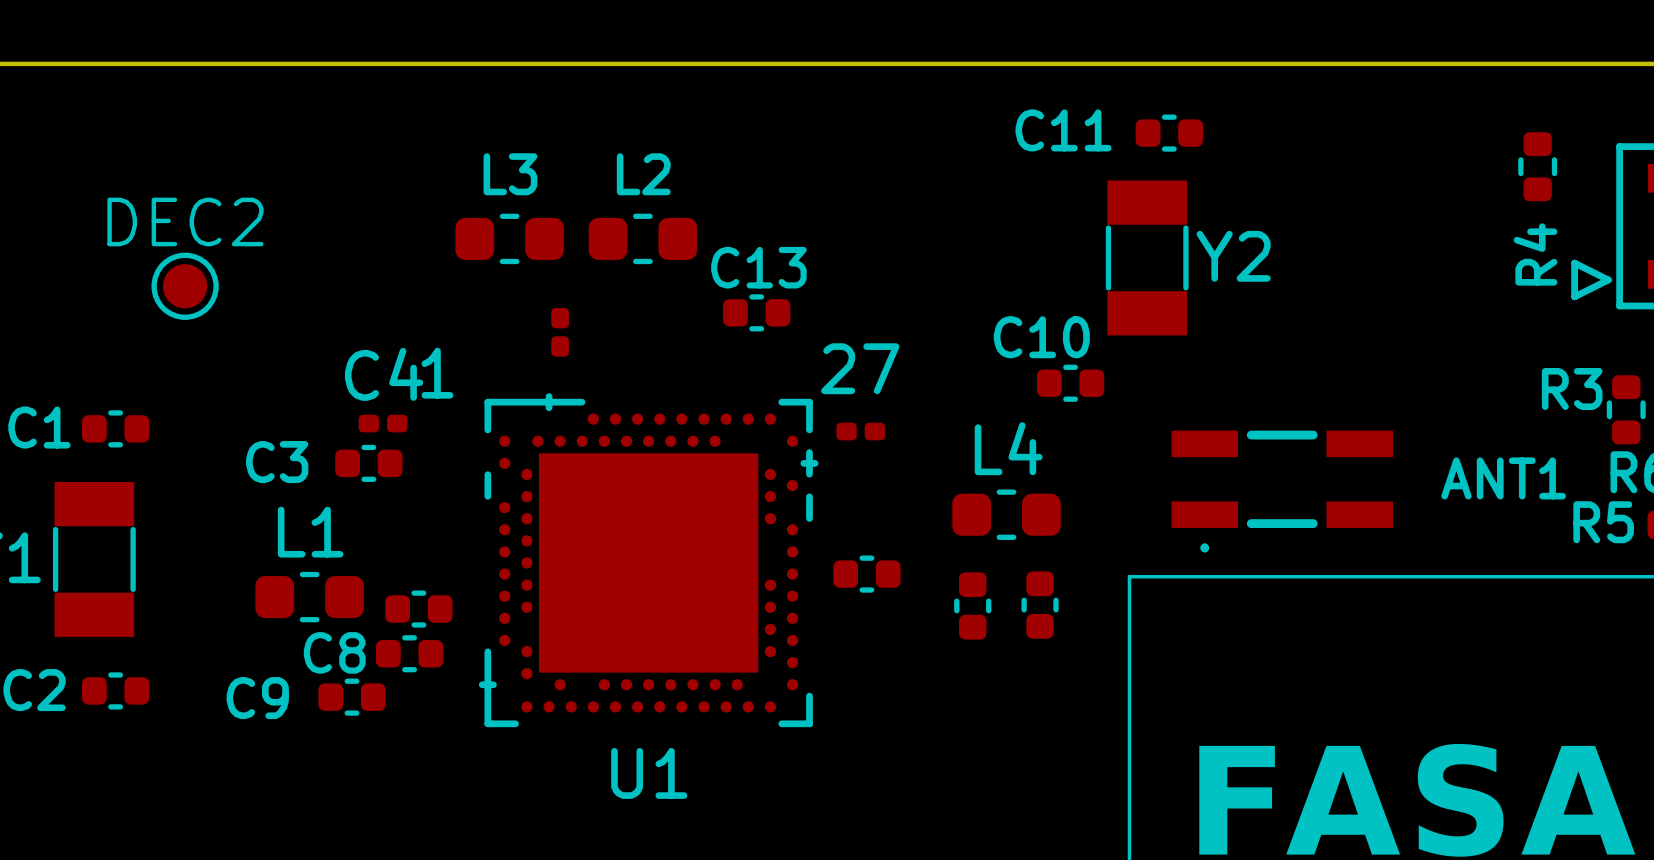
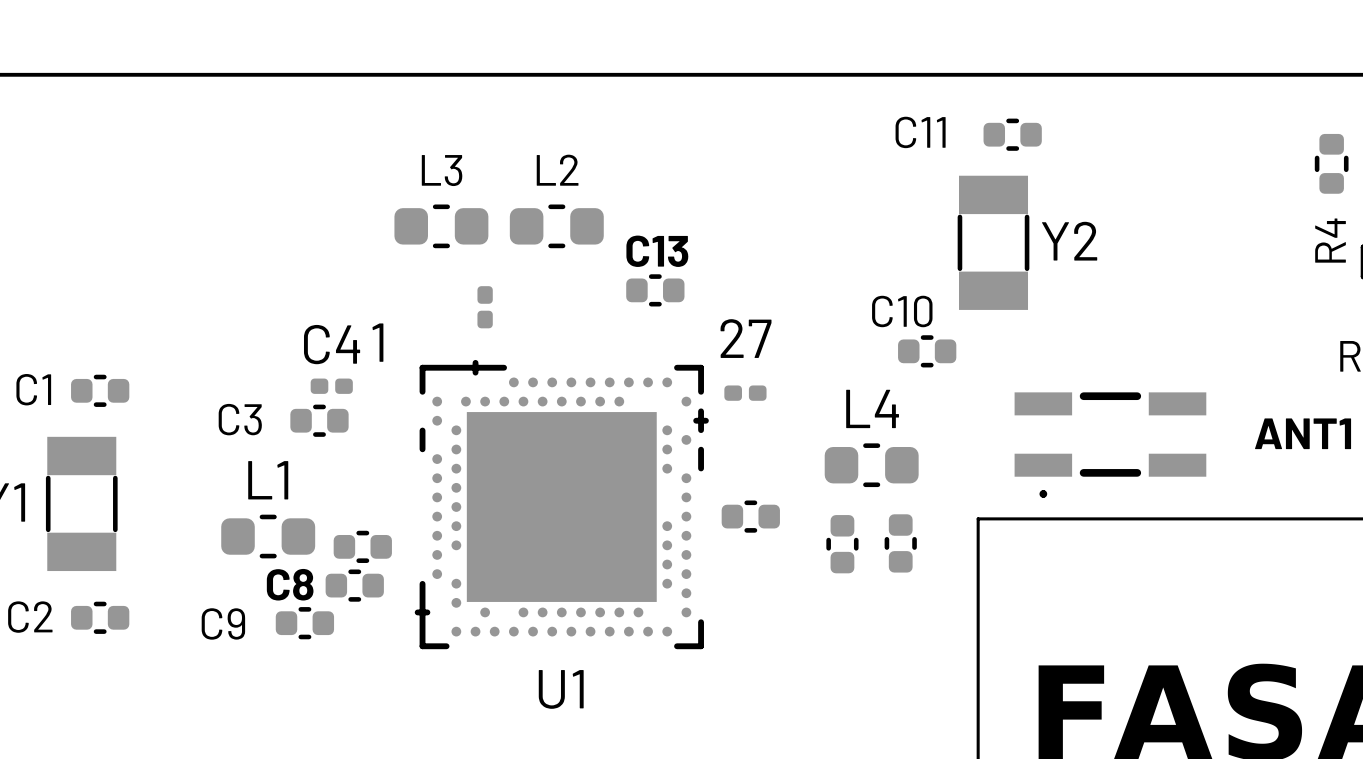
text: DEC2 (185, 221) -> none
part: (185, 286) -> none

